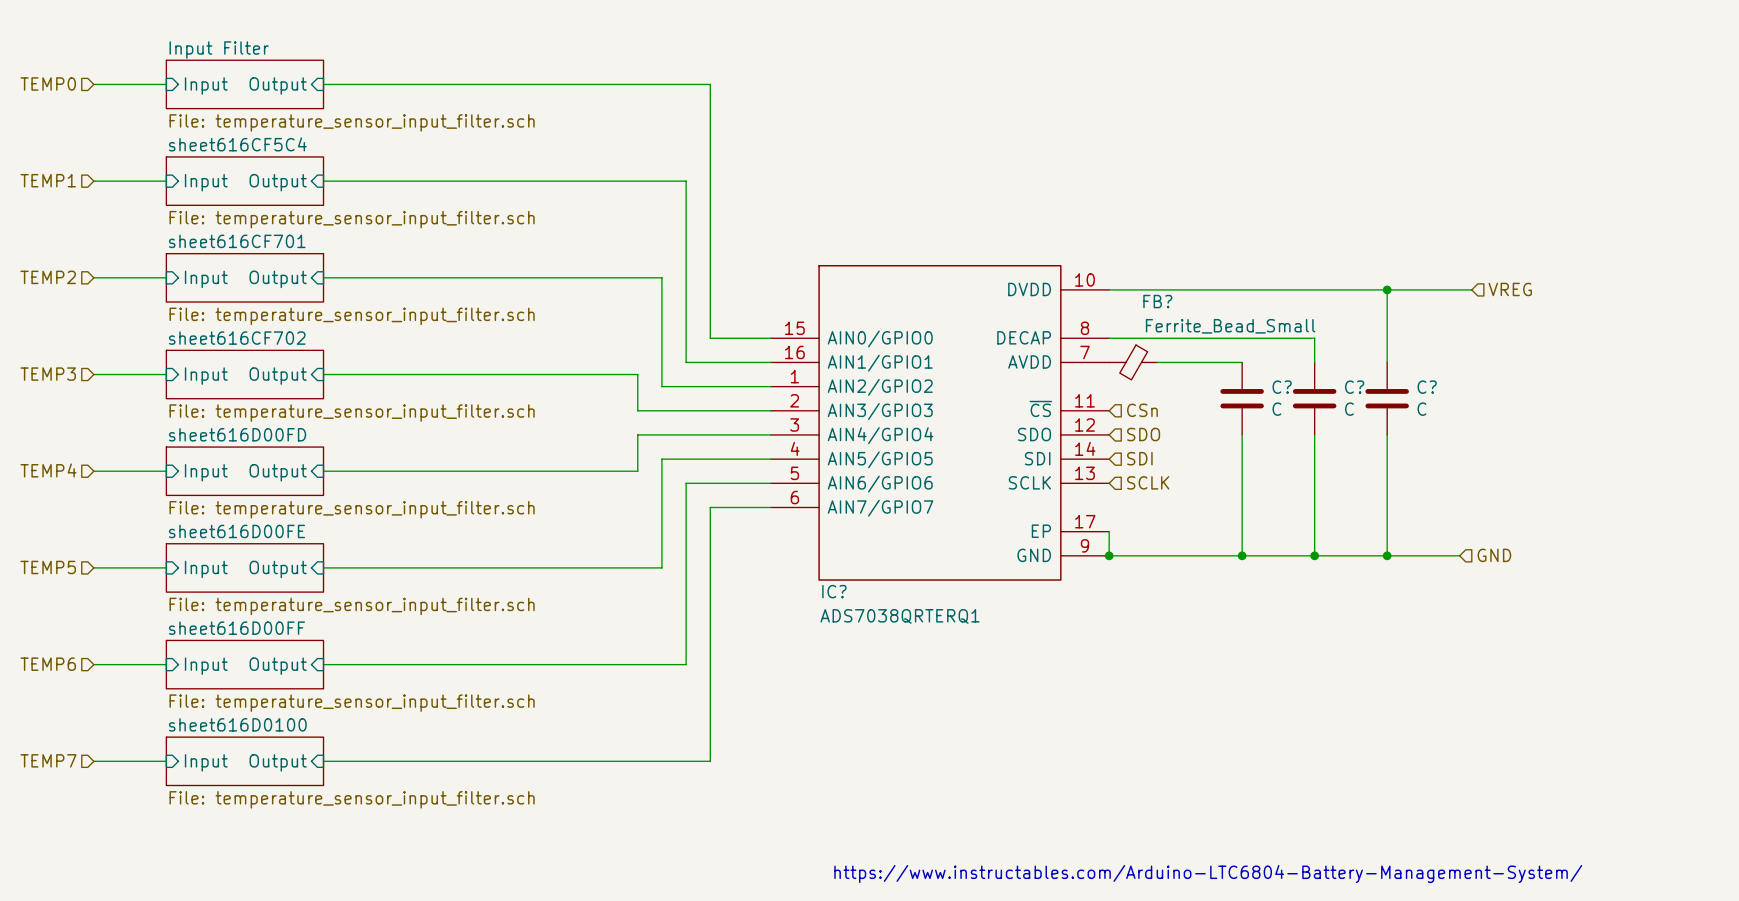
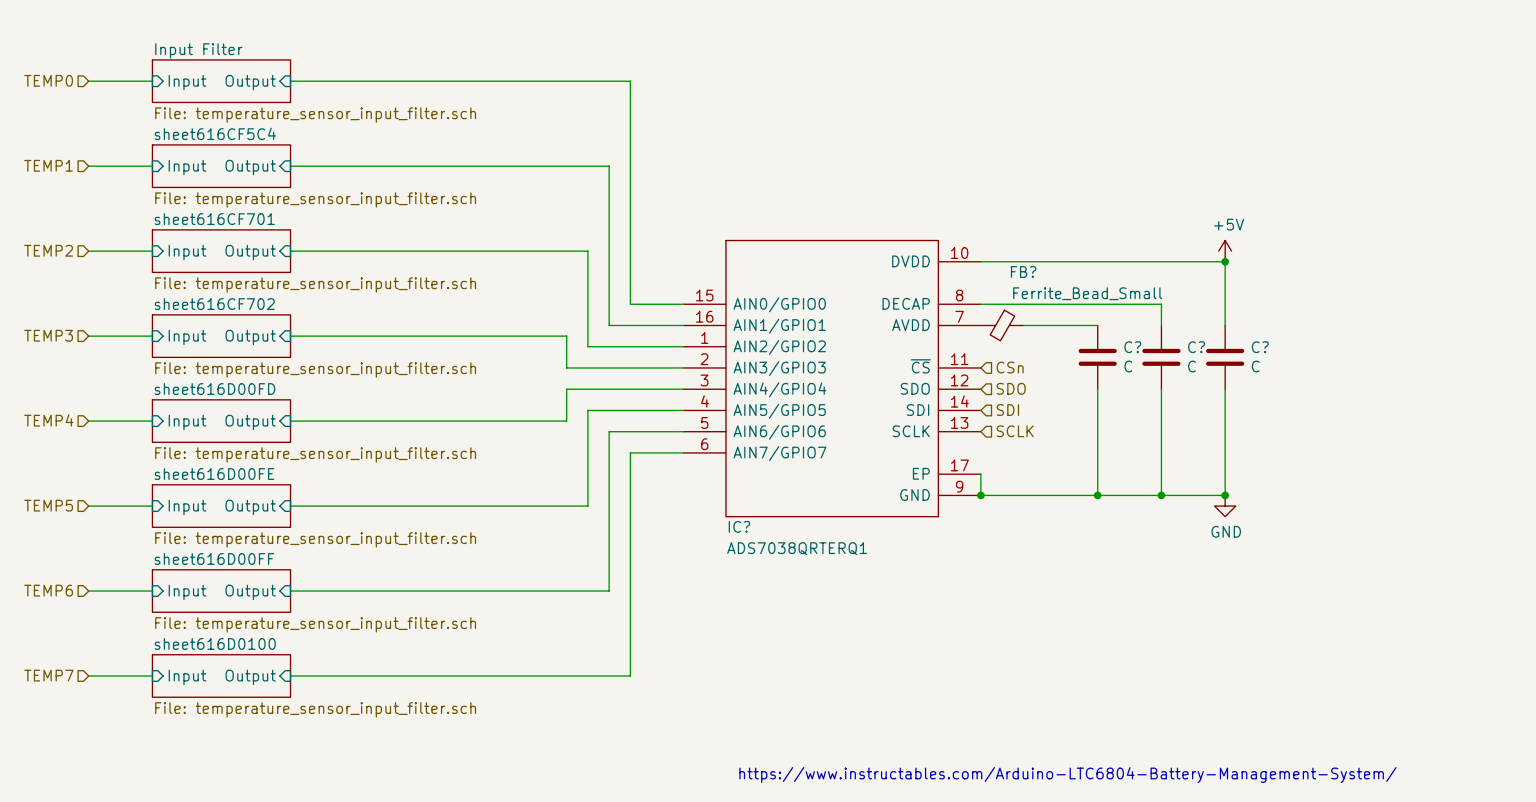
power symbol: none -> +5V (1225, 251)
wire: (1387, 289) (1471, 289) -> none
hierarchical label: VREG (1510, 289) -> none
wire: (1387, 555) (1459, 555) -> none
hierarchical label: GND (1494, 555) -> none
power symbol: none -> GND (1225, 506)

